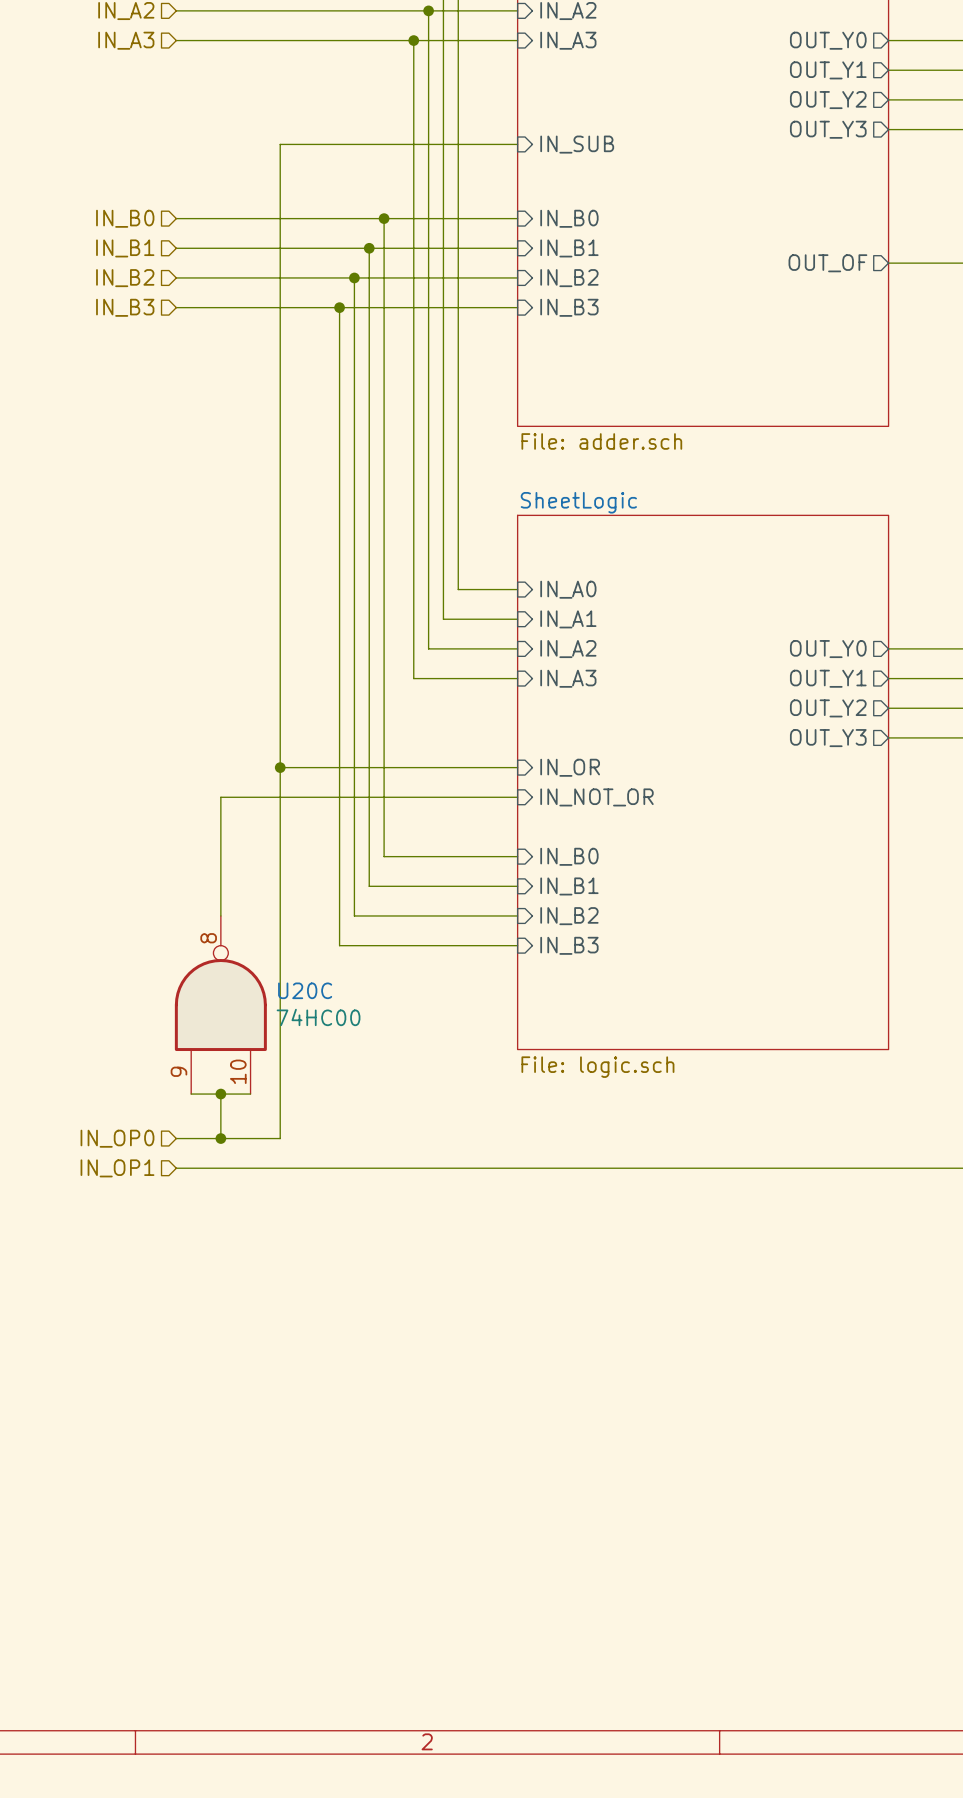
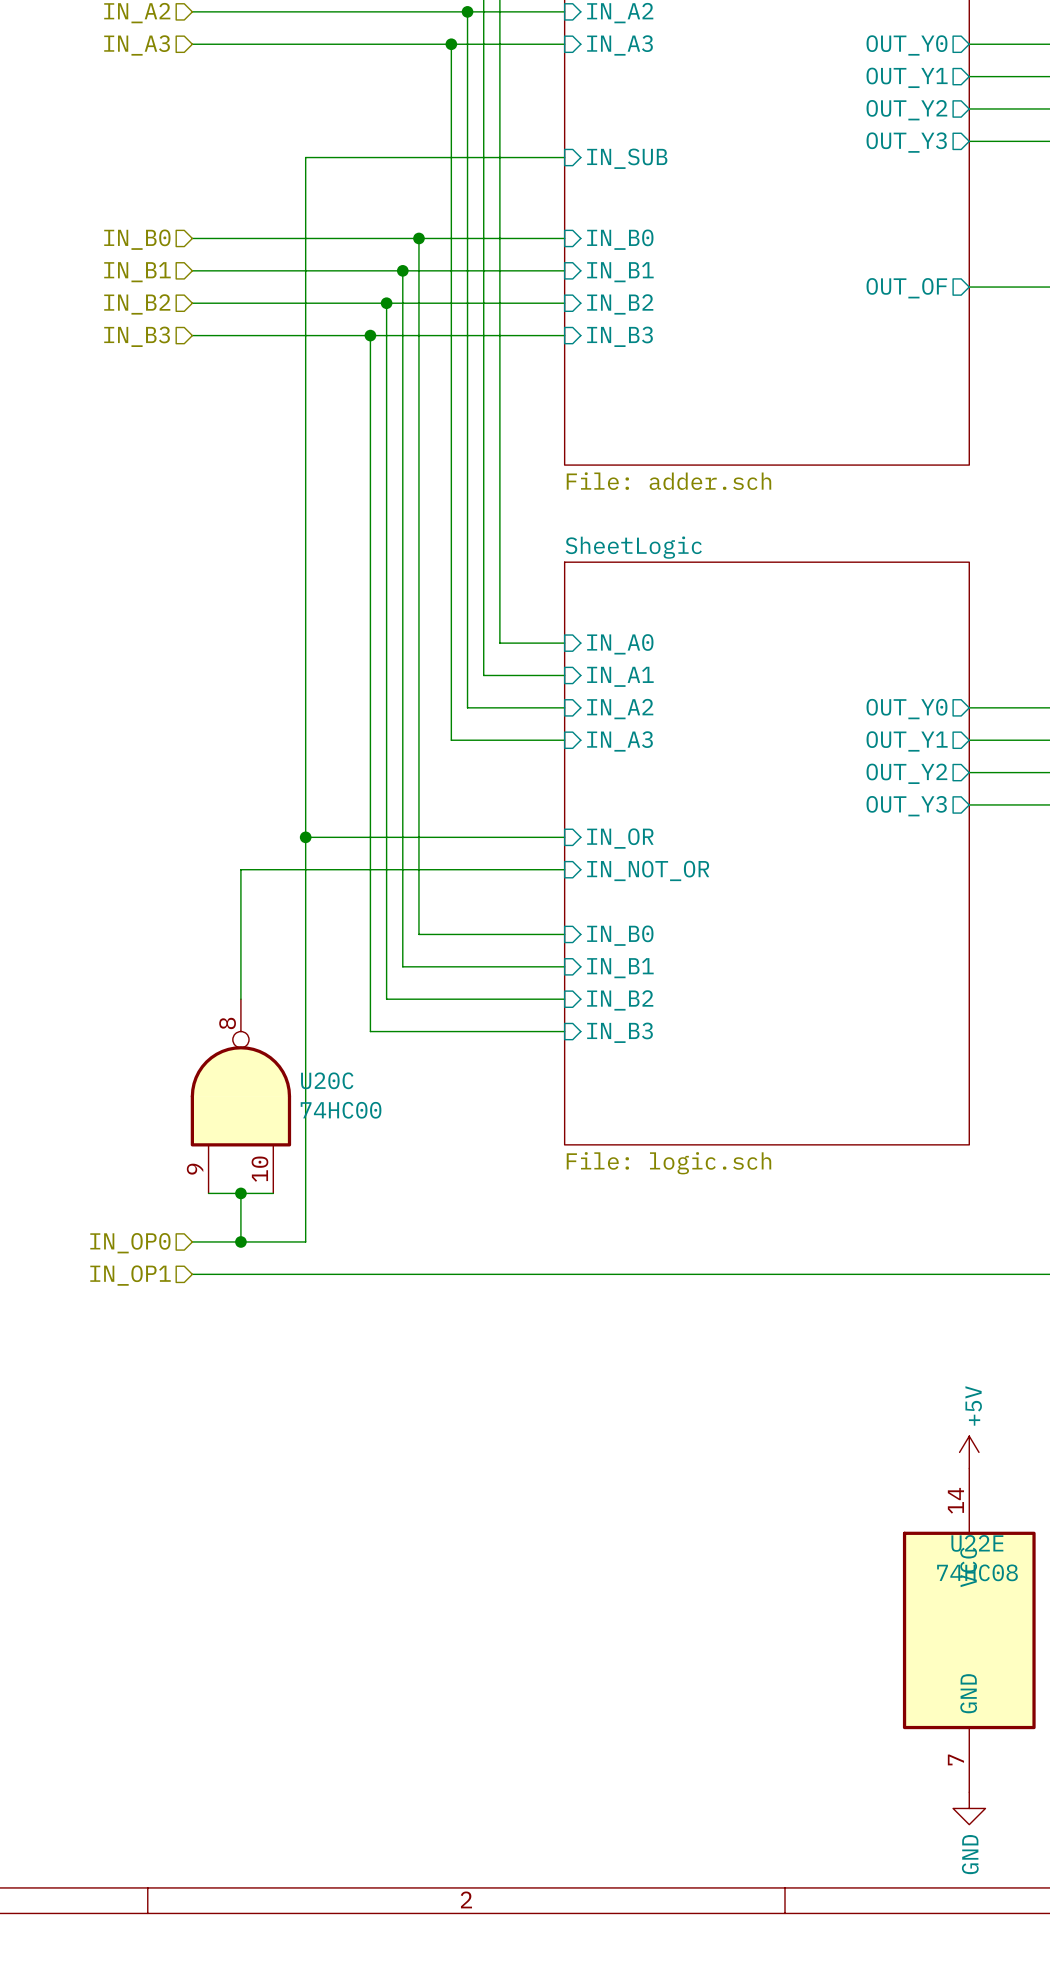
power symbol: none -> +5V (969, 1452)
U22E: none -> 74HC08 (969, 1630)
power symbol: none -> GND (969, 1808)

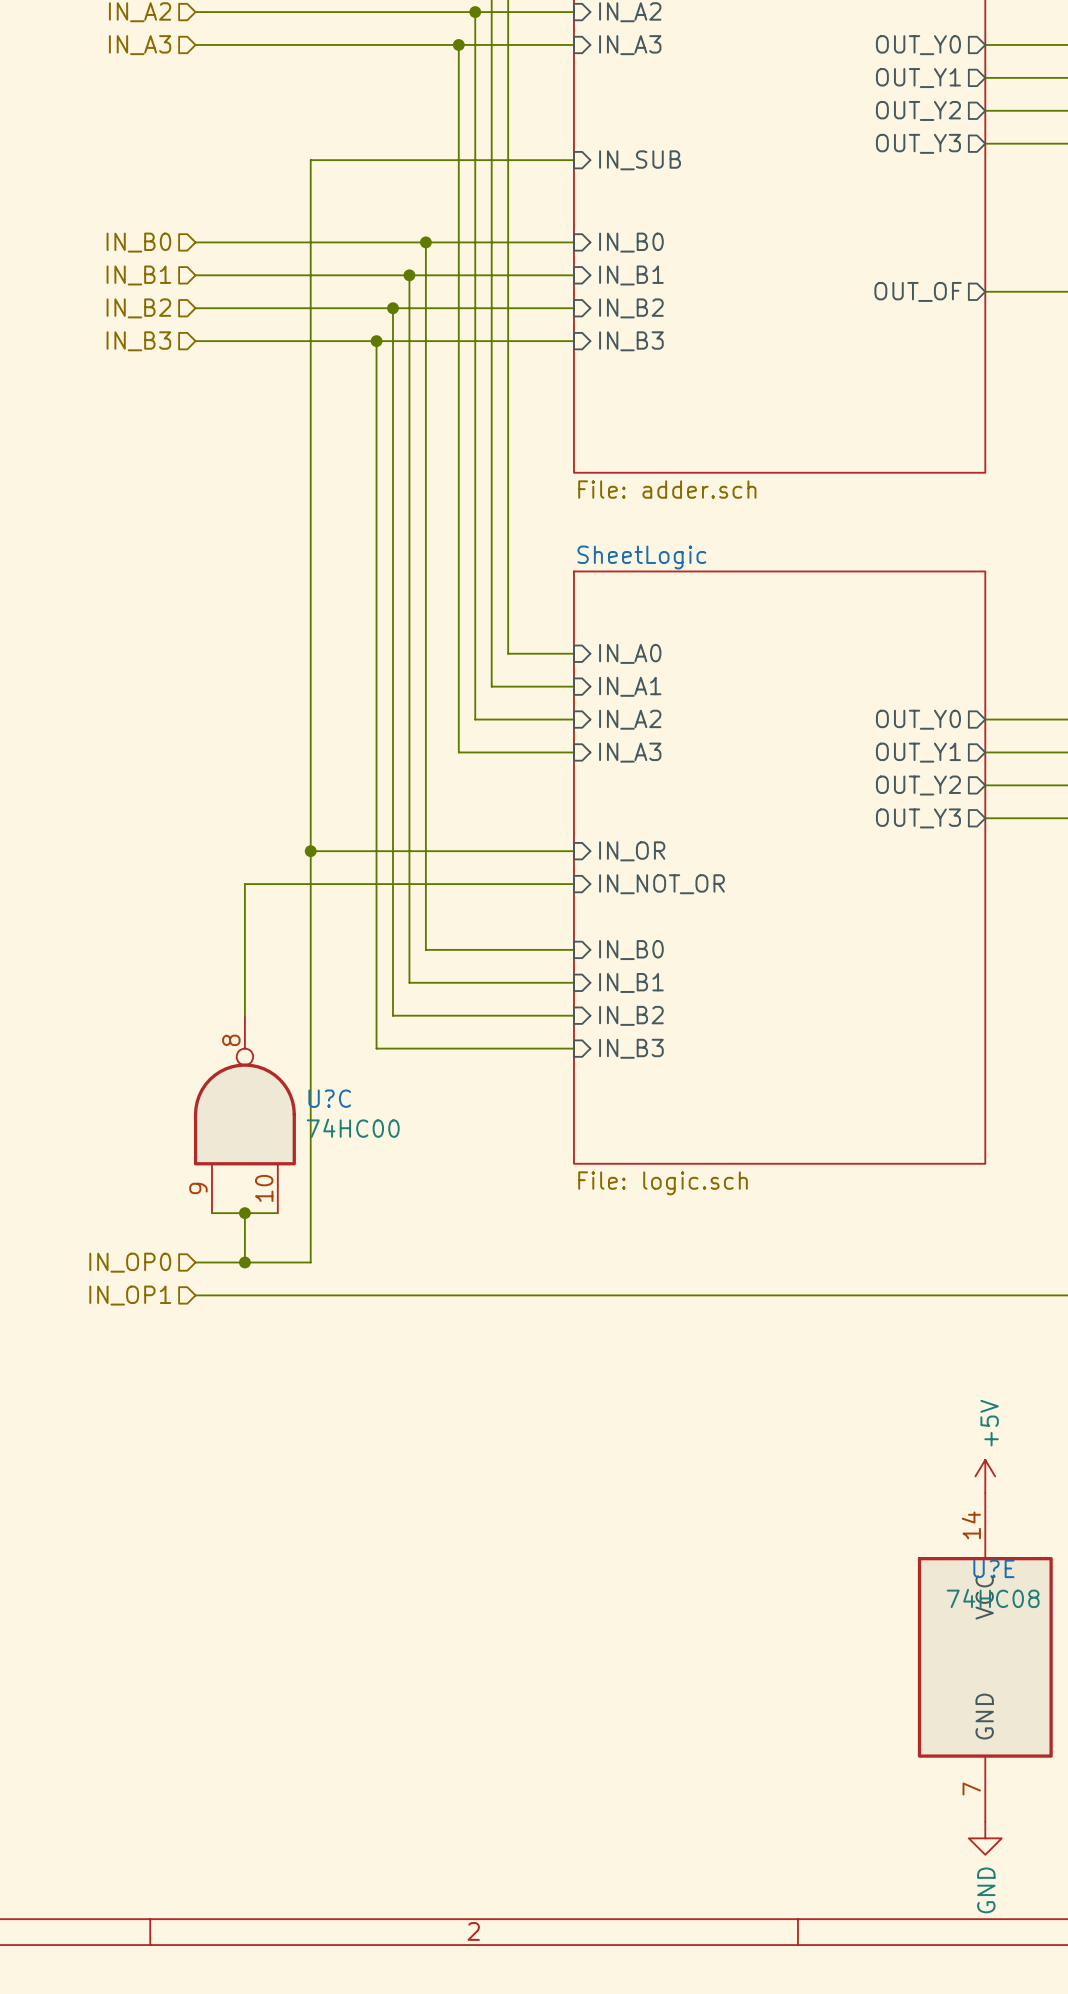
U20C name: U20C (327, 1080) -> U?C (329, 1098)
U22E name: U22E (977, 1543) -> U?E (993, 1568)

